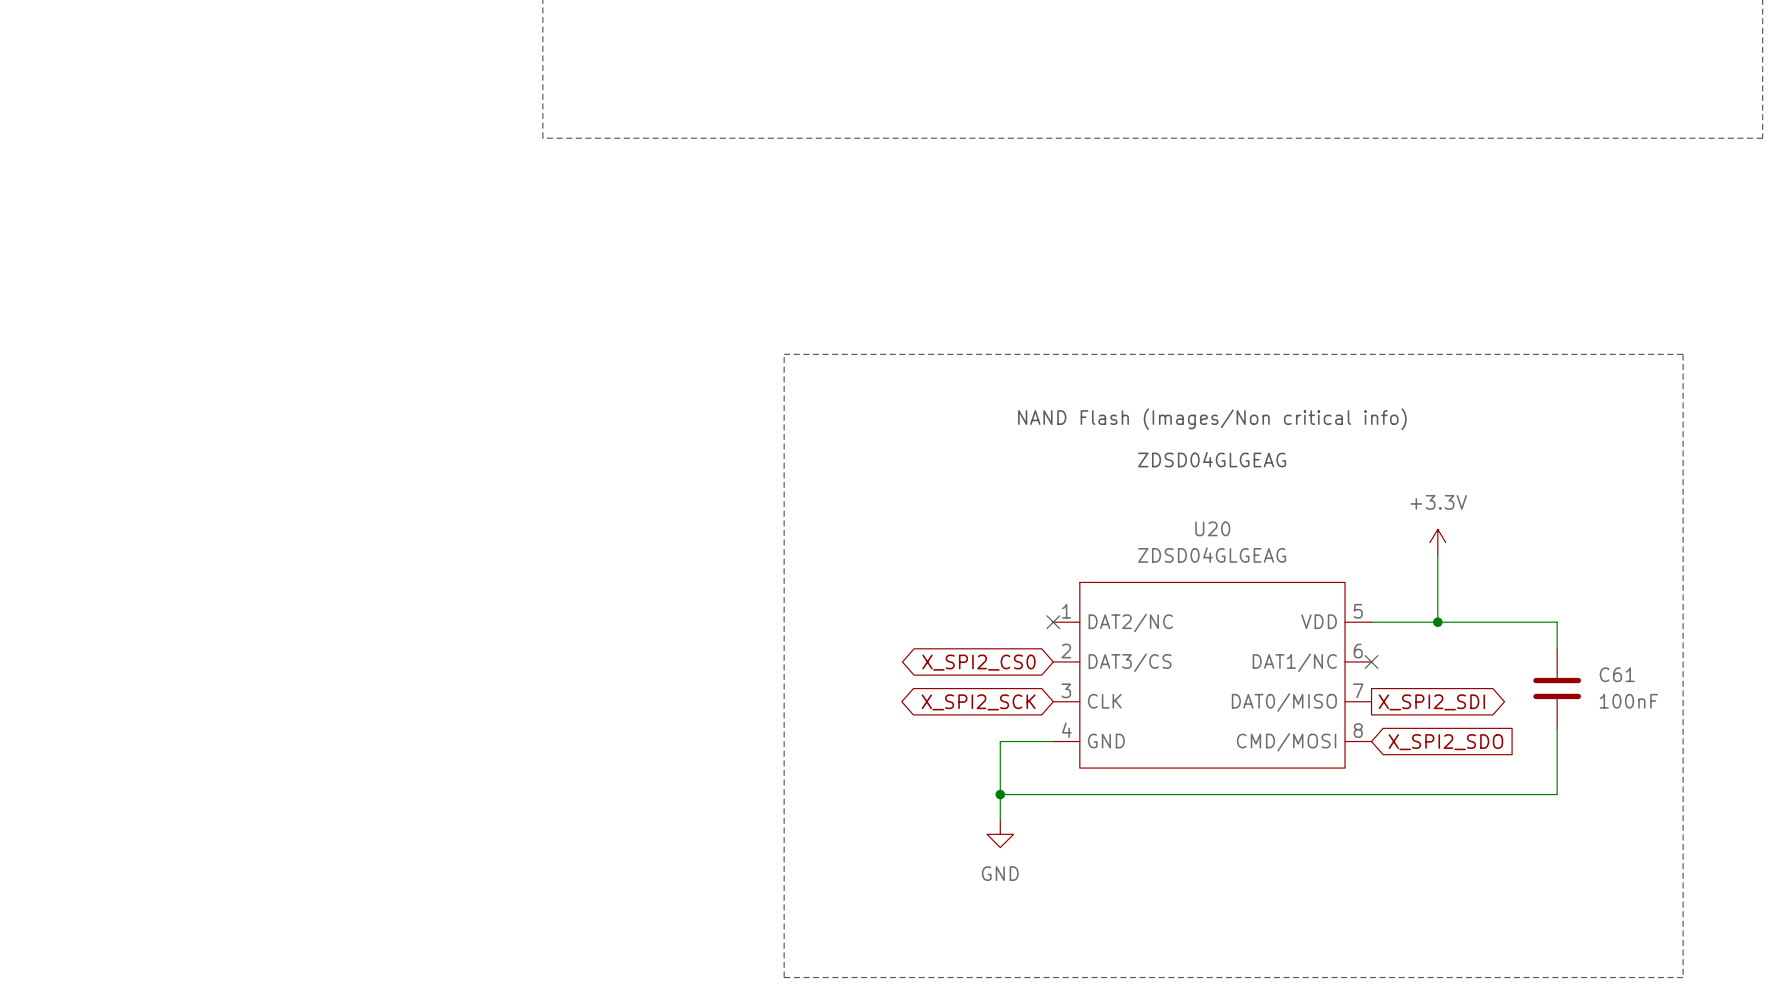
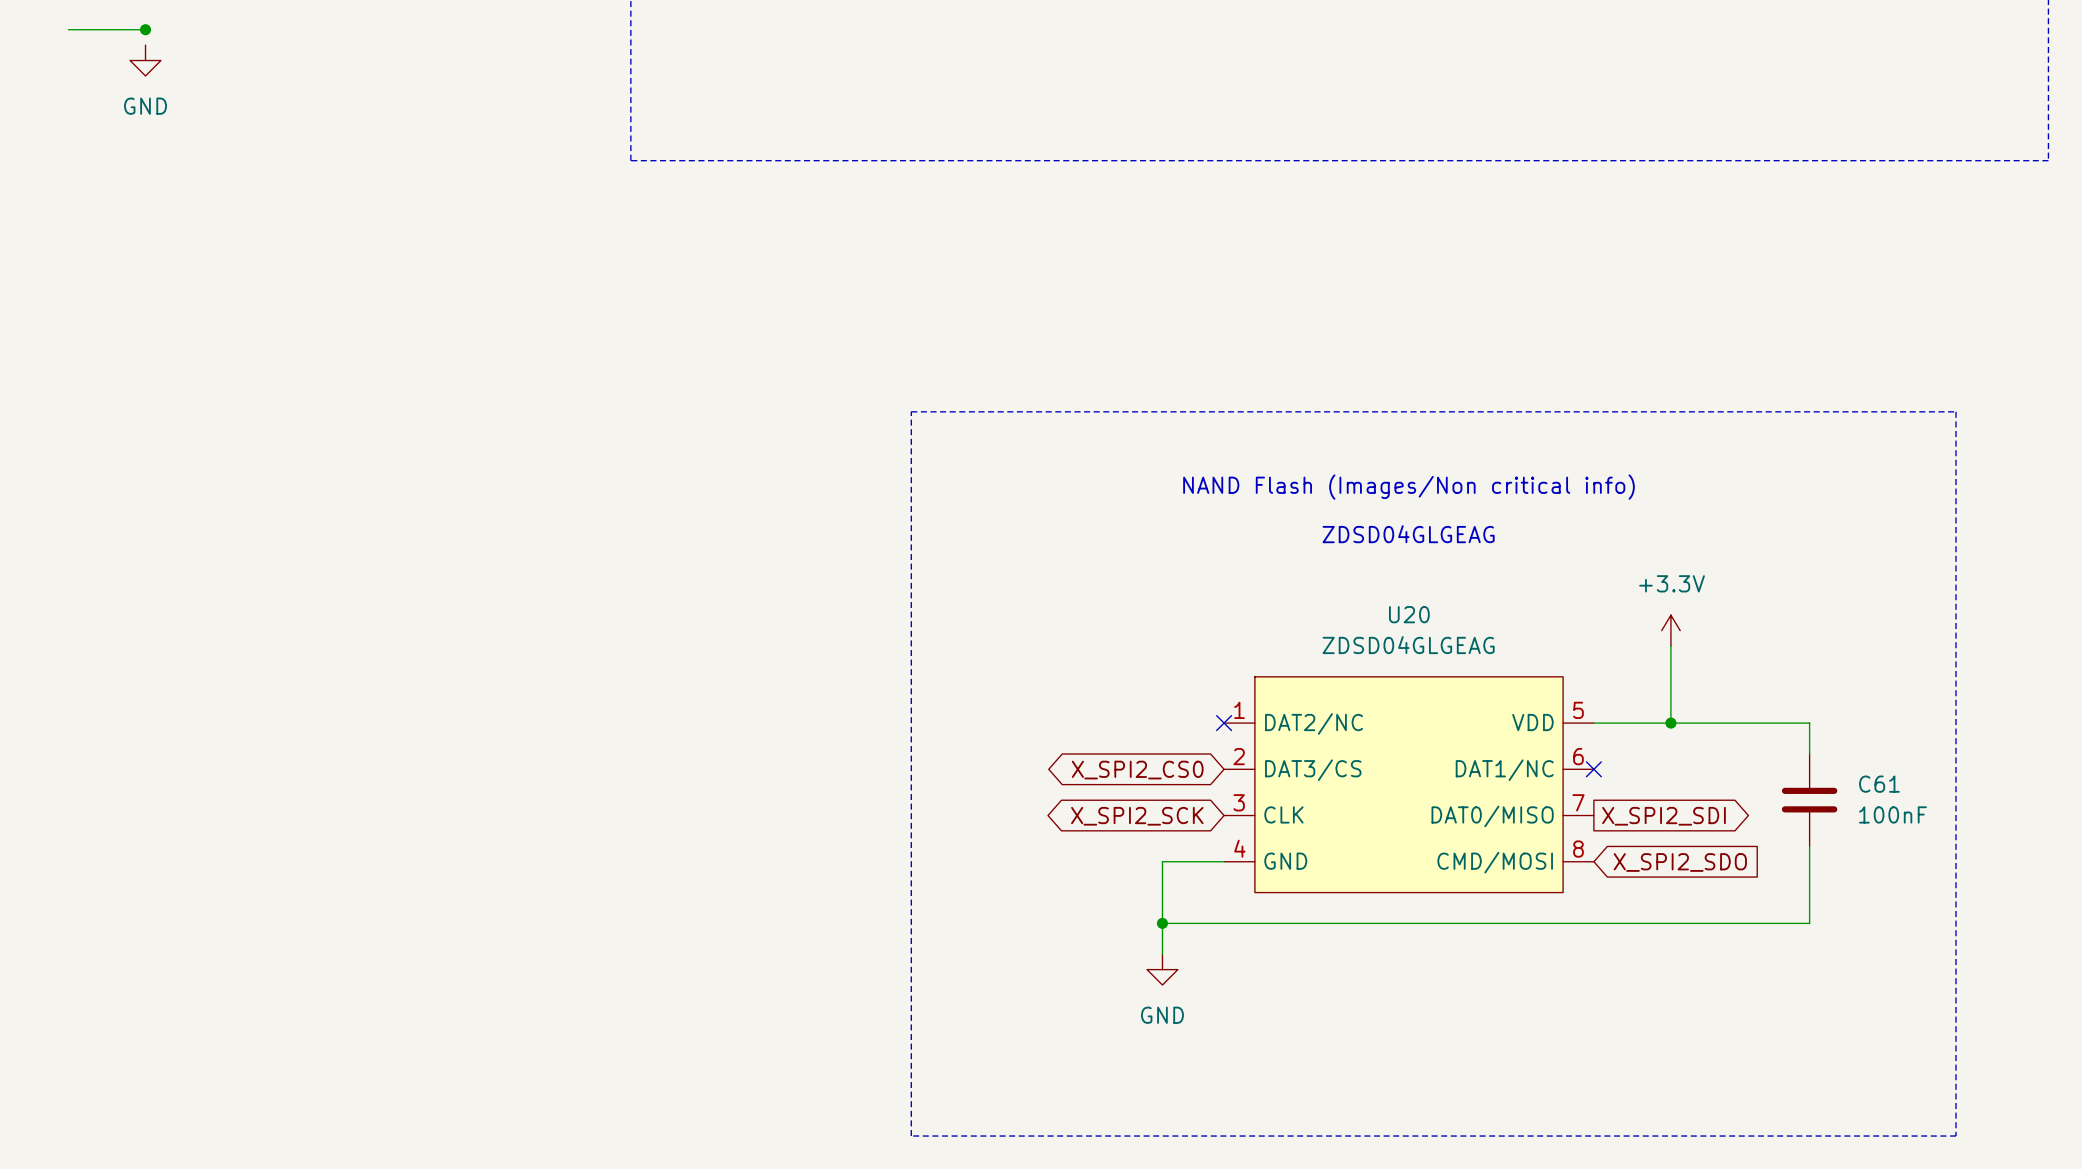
wire: none -> (68, 29) (145, 29)
junction: none -> (145, 29)
power symbol: none -> GND (145, 60)

